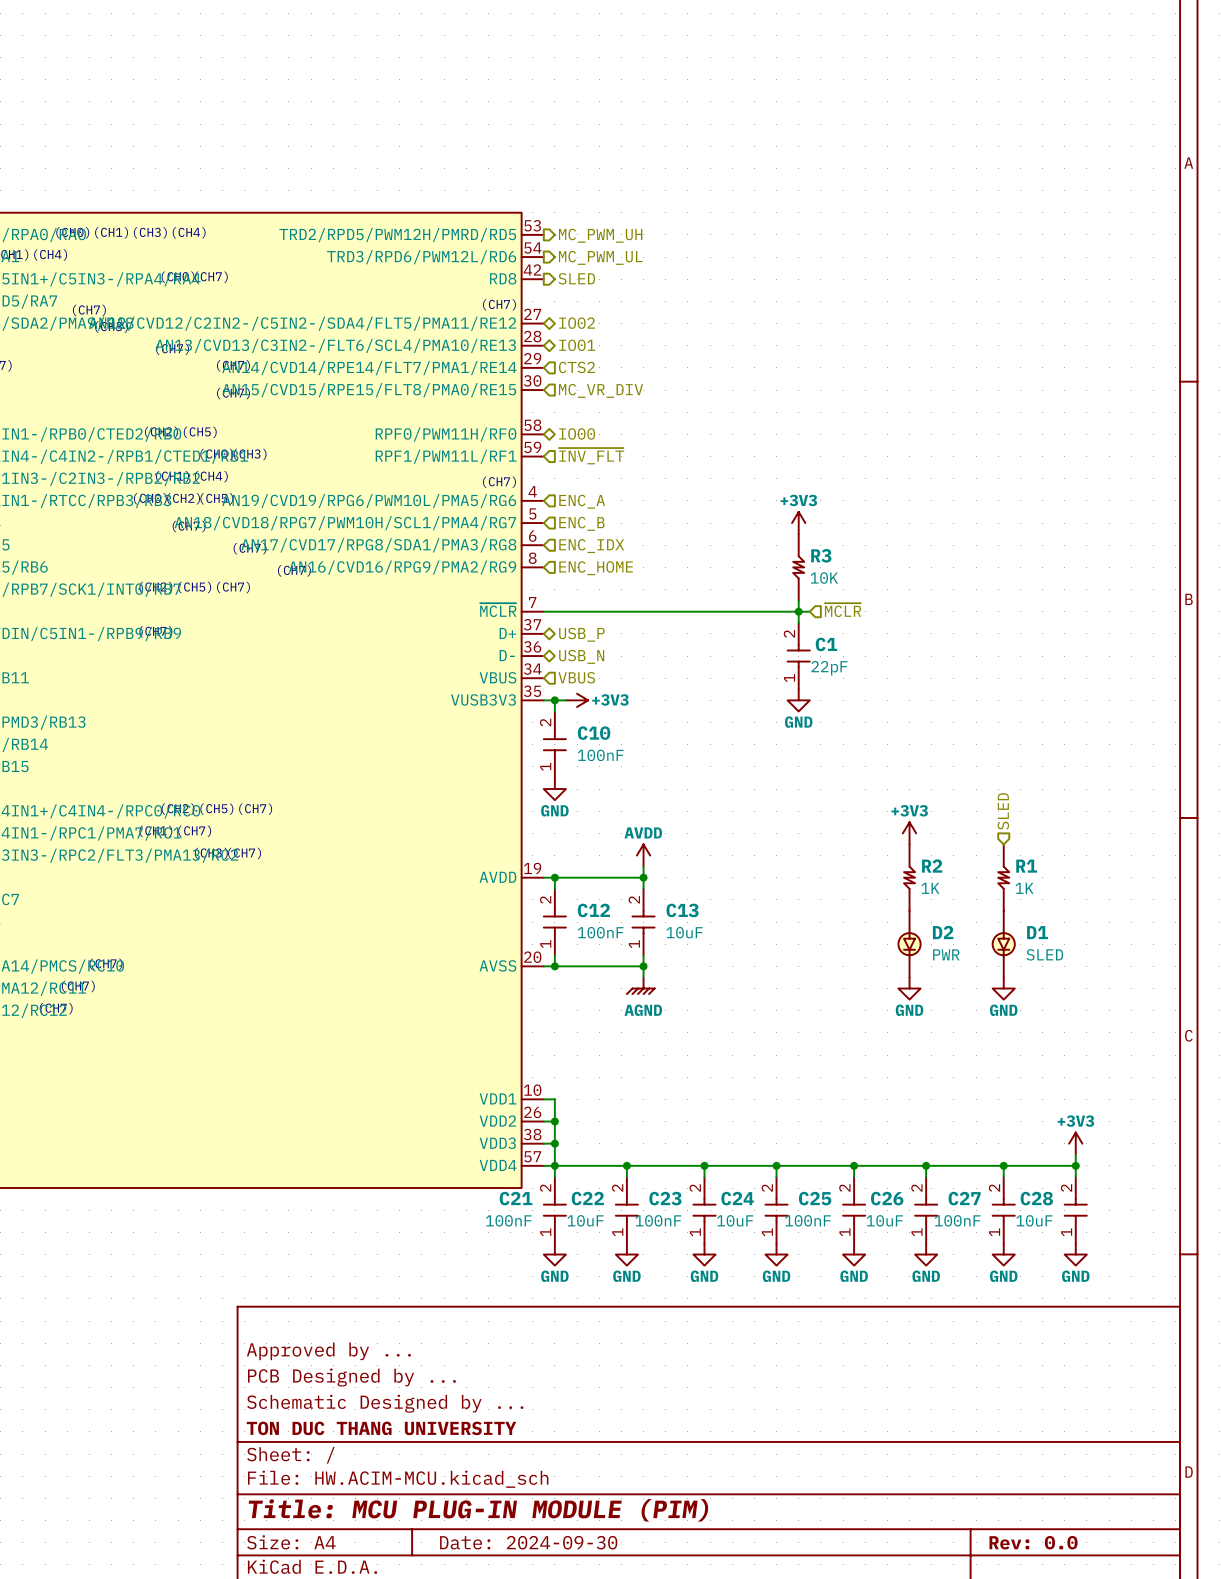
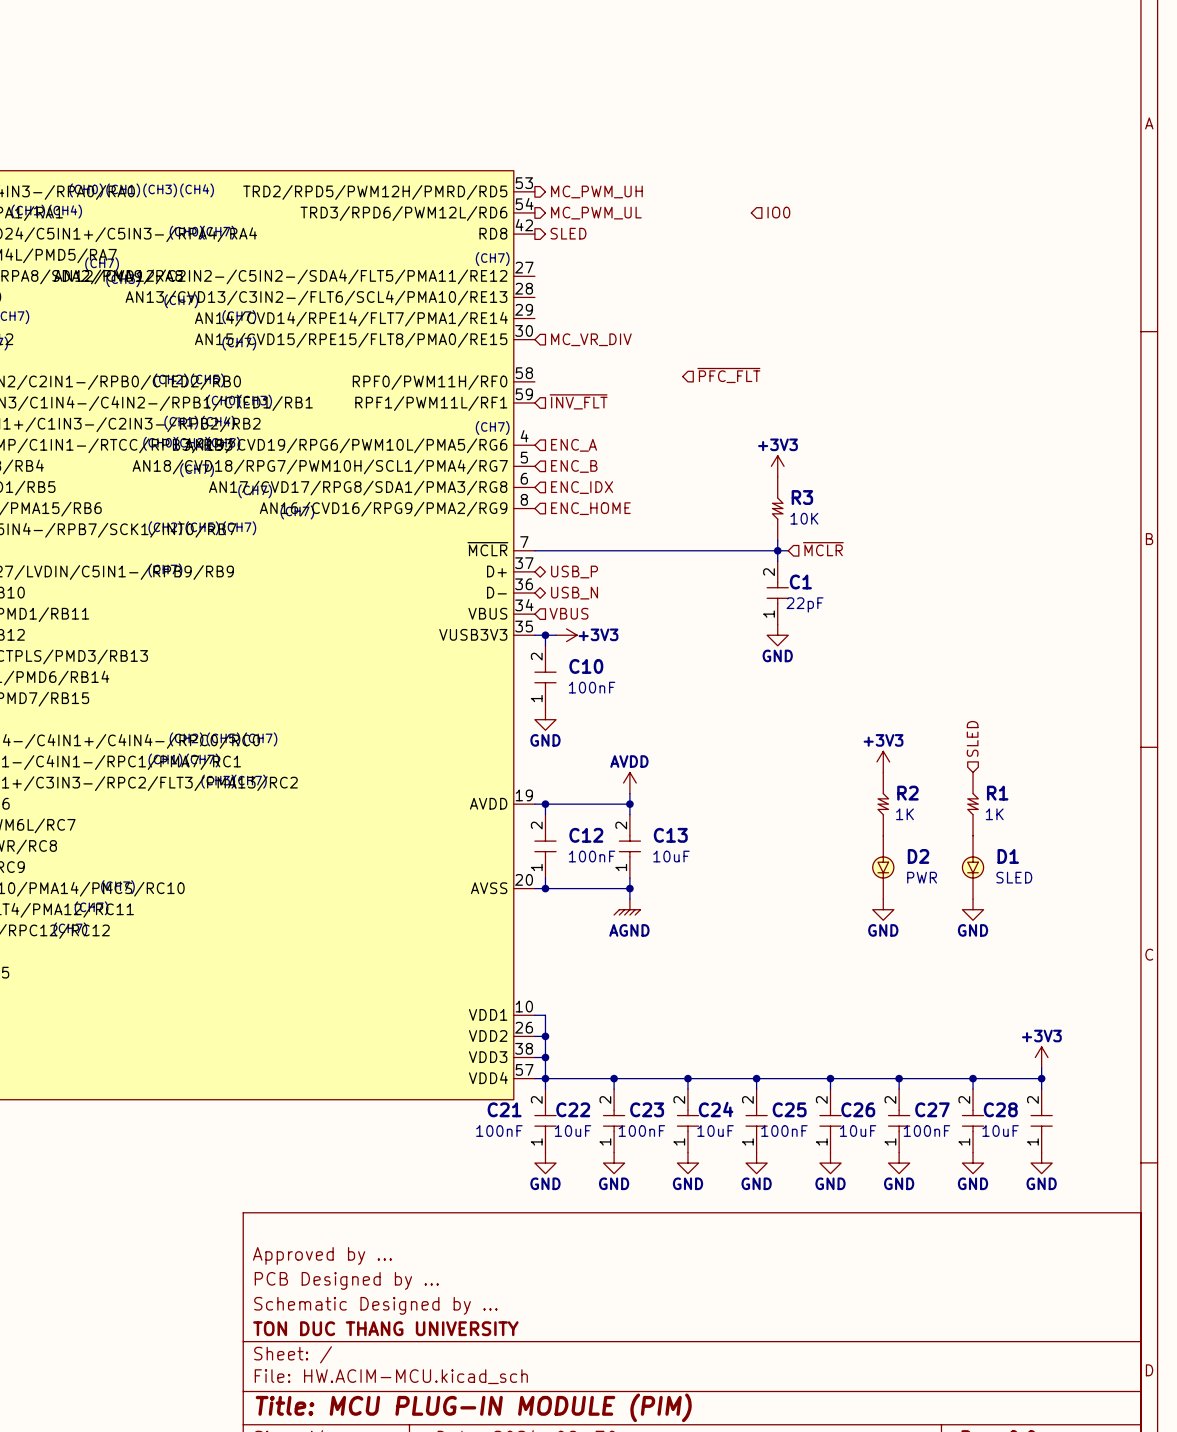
hierarchical label: none -> IO0 (778, 212)
hierarchical label: IO02 (577, 323) -> none
hierarchical label: IO01 (577, 345) -> none
hierarchical label: CTS2 (576, 367) -> none
hierarchical label: none -> ~{PFC_FLT} (728, 375)
hierarchical label: IO00 (577, 433) -> none

